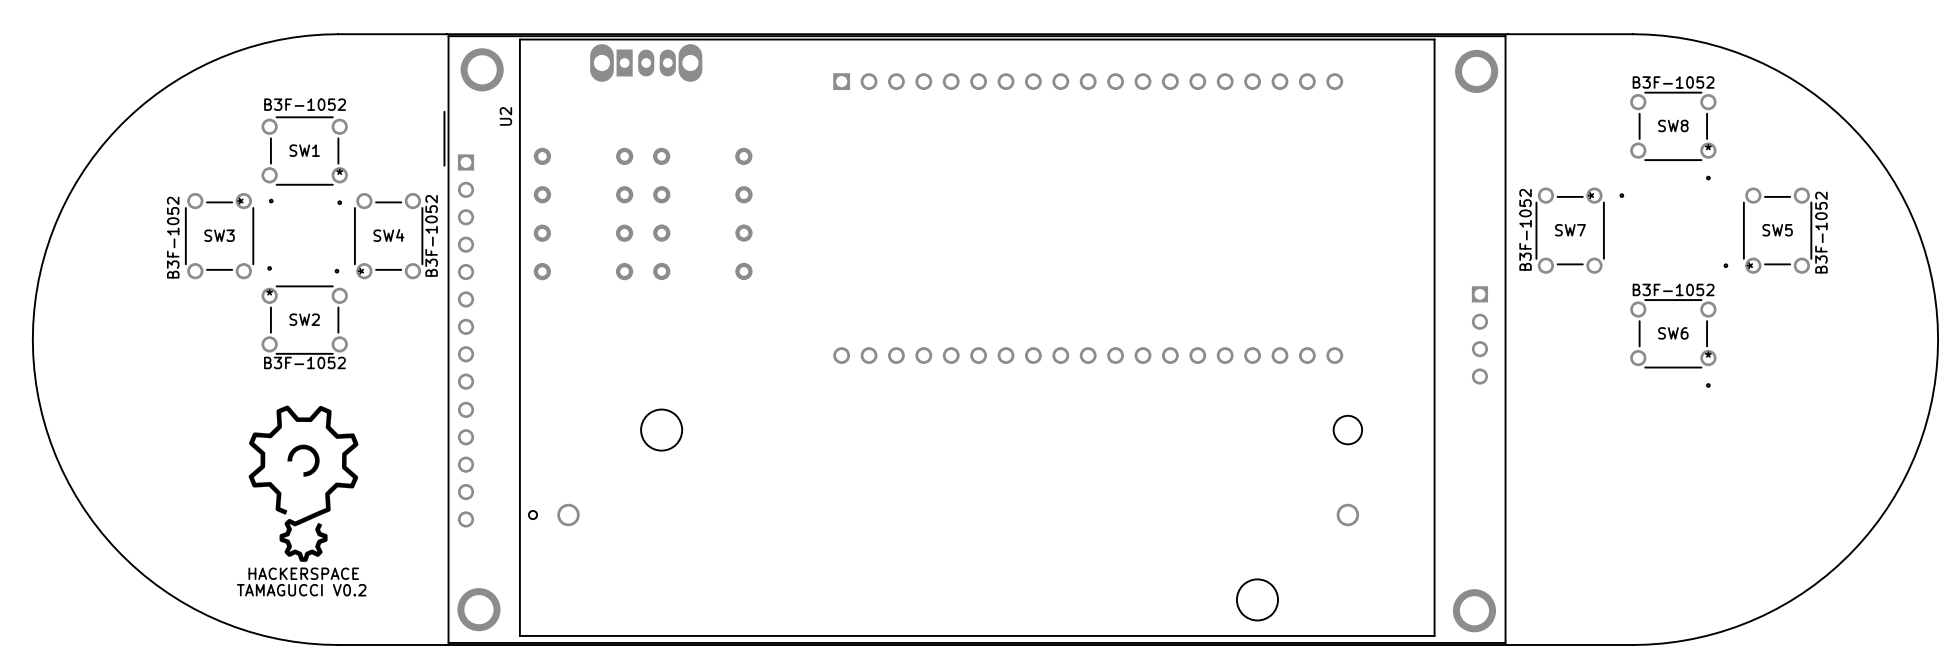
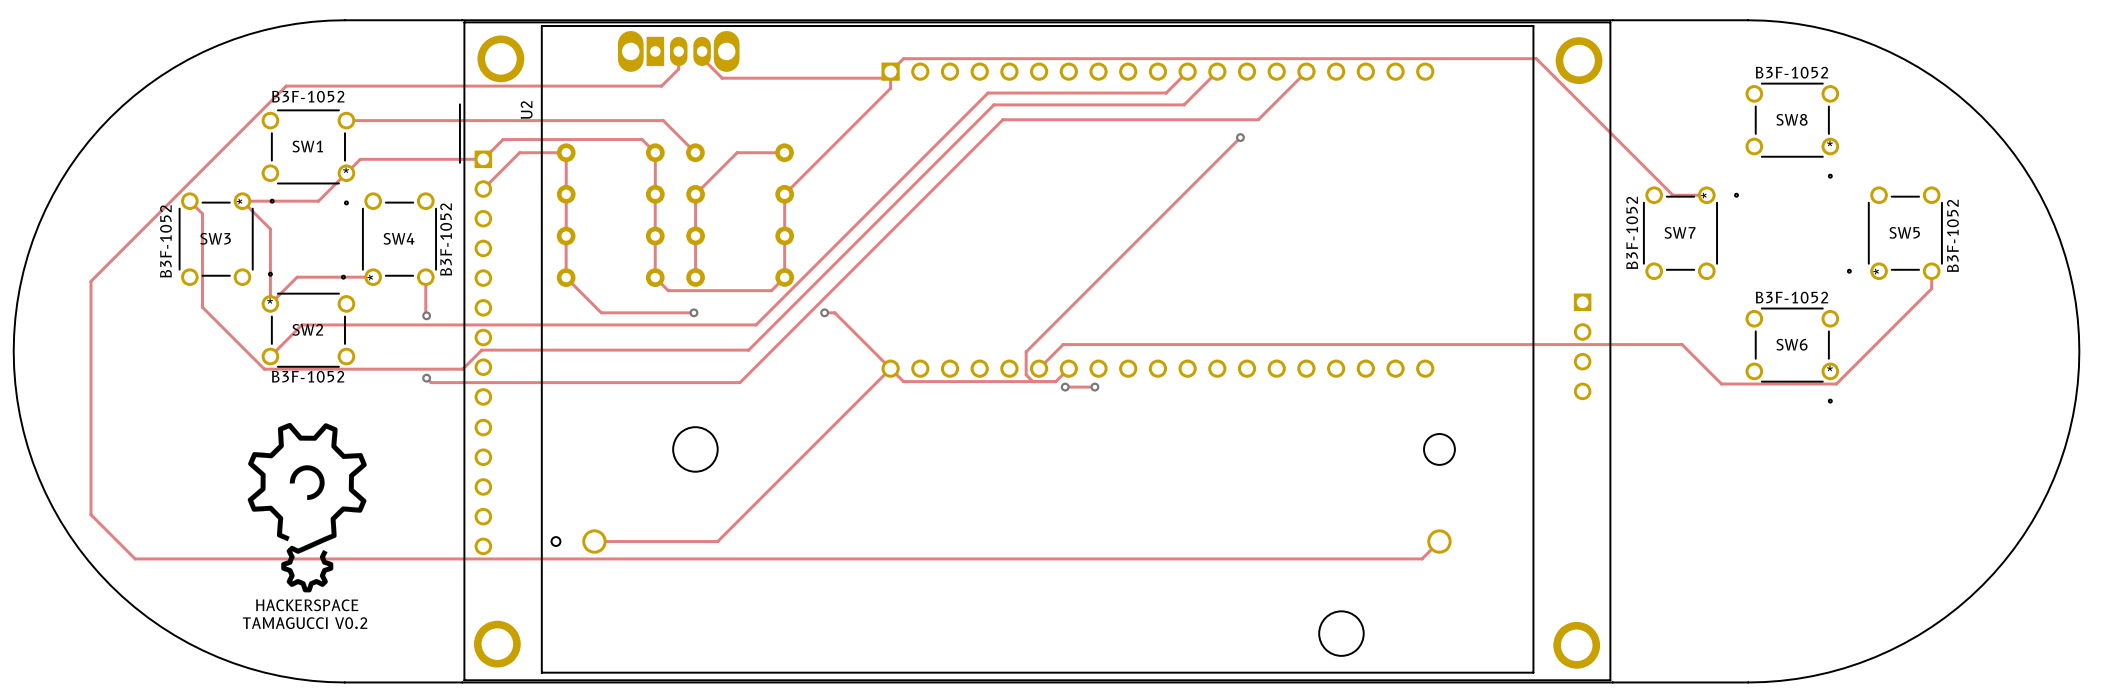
track: none -> (678, 51) (678, 69) (661, 86) (286, 86) (90, 281) (90, 514) (135, 558) (1422, 558) (1439, 541)
track: none -> (702, 51) (702, 58) (722, 78) (884, 78) (903, 58) (1536, 58) (1672, 195) (1706, 195)
track: none -> (890, 71) (890, 88) (784, 194) (784, 277) (771, 290) (668, 290) (655, 277) (655, 194)
track: none -> (1187, 71) (1166, 93) (987, 93) (756, 324) (302, 324) (270, 356)
track: none -> (1217, 71) (1184, 104) (993, 104) (748, 350) (481, 350) (462, 369) (264, 369) (202, 307) (202, 213) (189, 201)
track: none -> (1306, 71) (1258, 119) (1002, 119) (739, 382) (431, 382) (426, 378)
track: none -> (346, 120) (663, 120) (695, 152)
track: none -> (1240, 137) (1026, 351) (1026, 374) (1032, 381)
via: none -> (1240, 137)
track: none -> (784, 152) (737, 152) (695, 194) (695, 277)
track: none -> (484, 188) (519, 152) (566, 152) (566, 235)
track: none -> (655, 194) (655, 152) (642, 139) (503, 139) (483, 159) (360, 159) (318, 201) (242, 201) (270, 229) (270, 303) (297, 277) (373, 277)
track: none -> (566, 236) (566, 277) (601, 312) (693, 312)
track: none -> (1931, 271) (1931, 288) (1836, 384) (1721, 384) (1682, 344) (1063, 344) (1039, 368)
track: none -> (425, 277) (426, 315)
via: none -> (693, 312)
track: none -> (824, 312) (834, 312) (903, 381) (1055, 381) (1068, 368)
via: none -> (824, 312)
via: none -> (426, 315)
track: none -> (890, 368) (717, 541) (594, 541)
via: none -> (426, 378)
track: none -> (1065, 387) (1094, 387)
via: none -> (1065, 387)
via: none -> (1094, 387)

